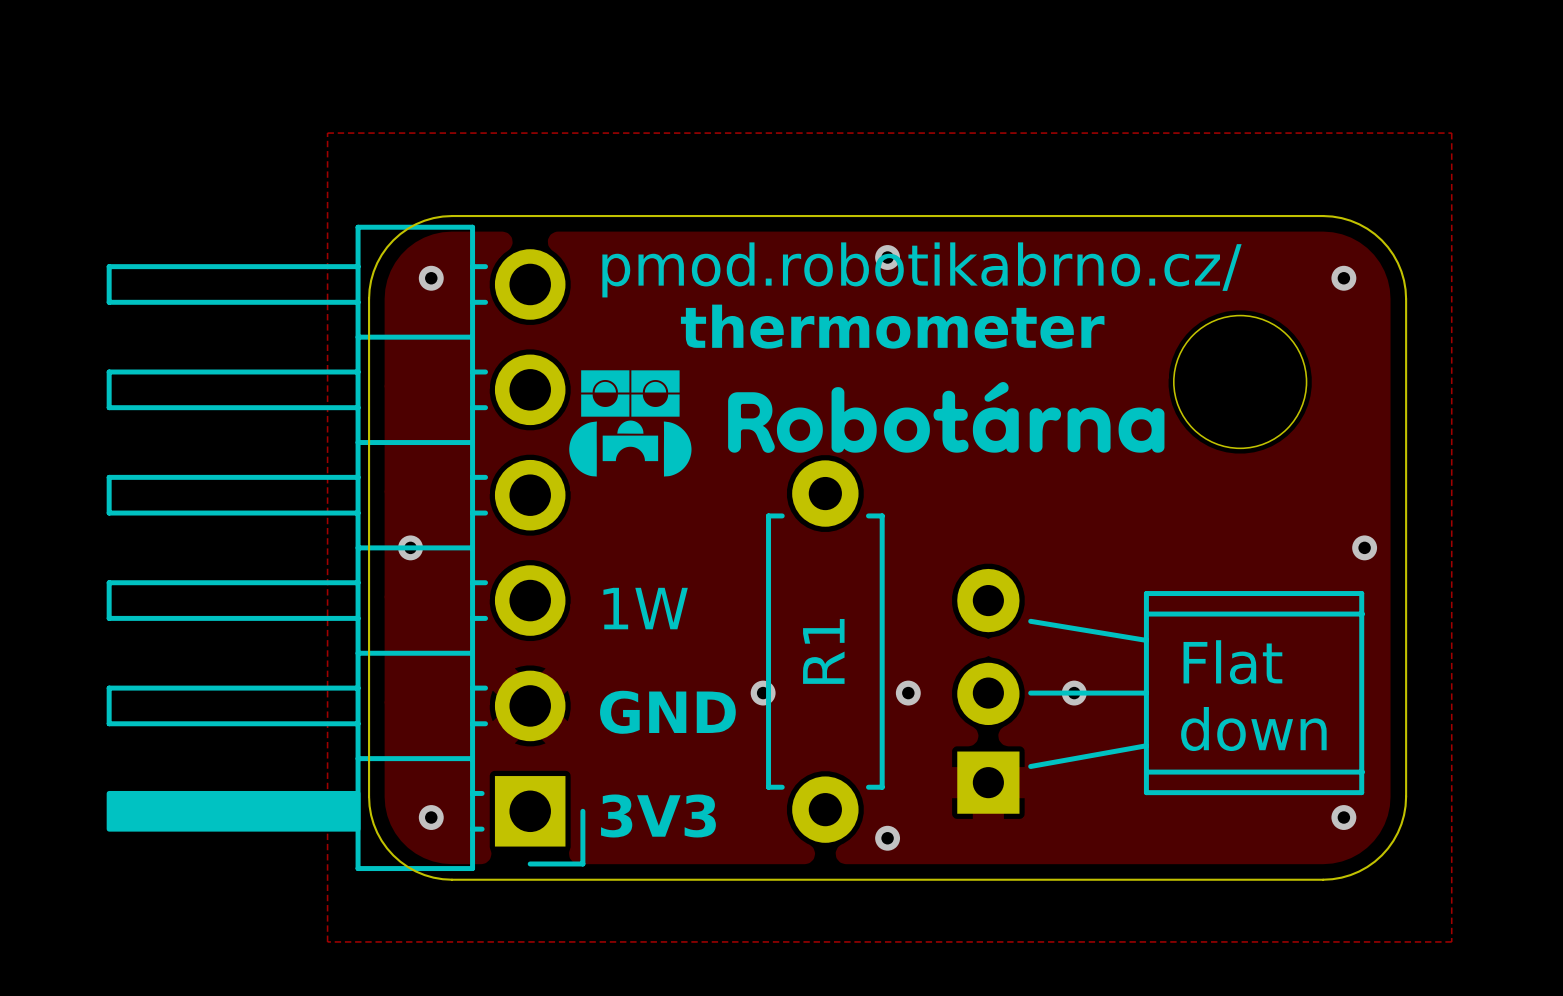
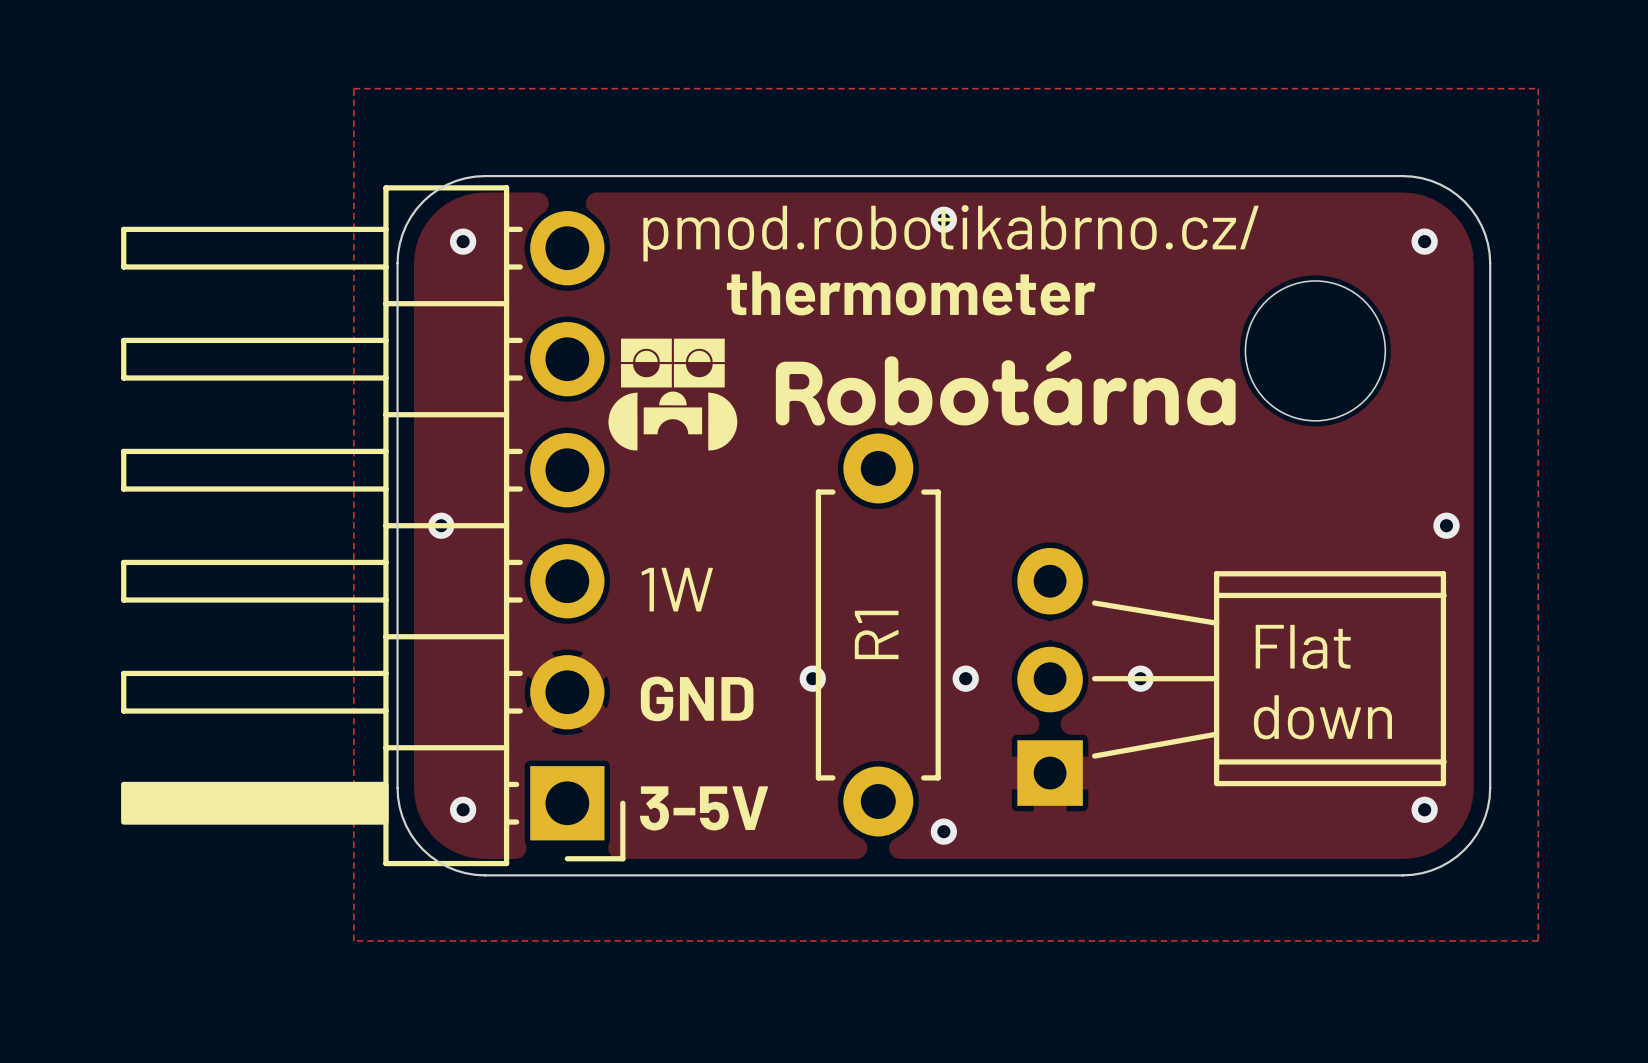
text: 3V3 (658, 816) -> 3-5V (704, 808)

